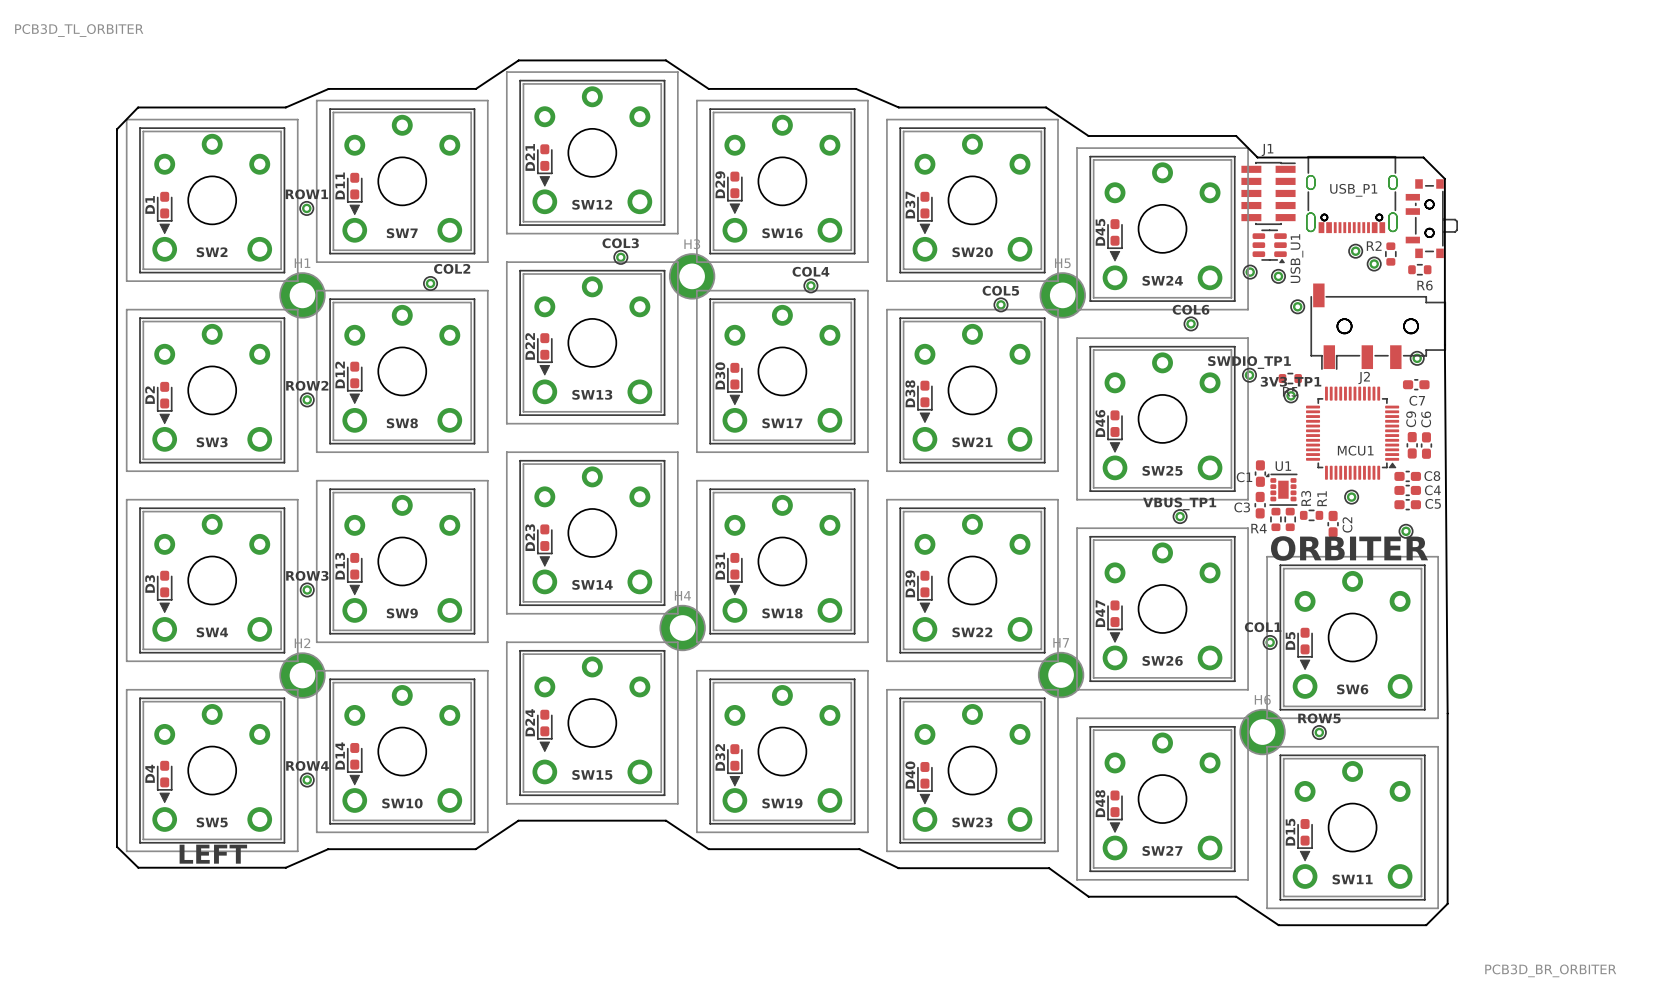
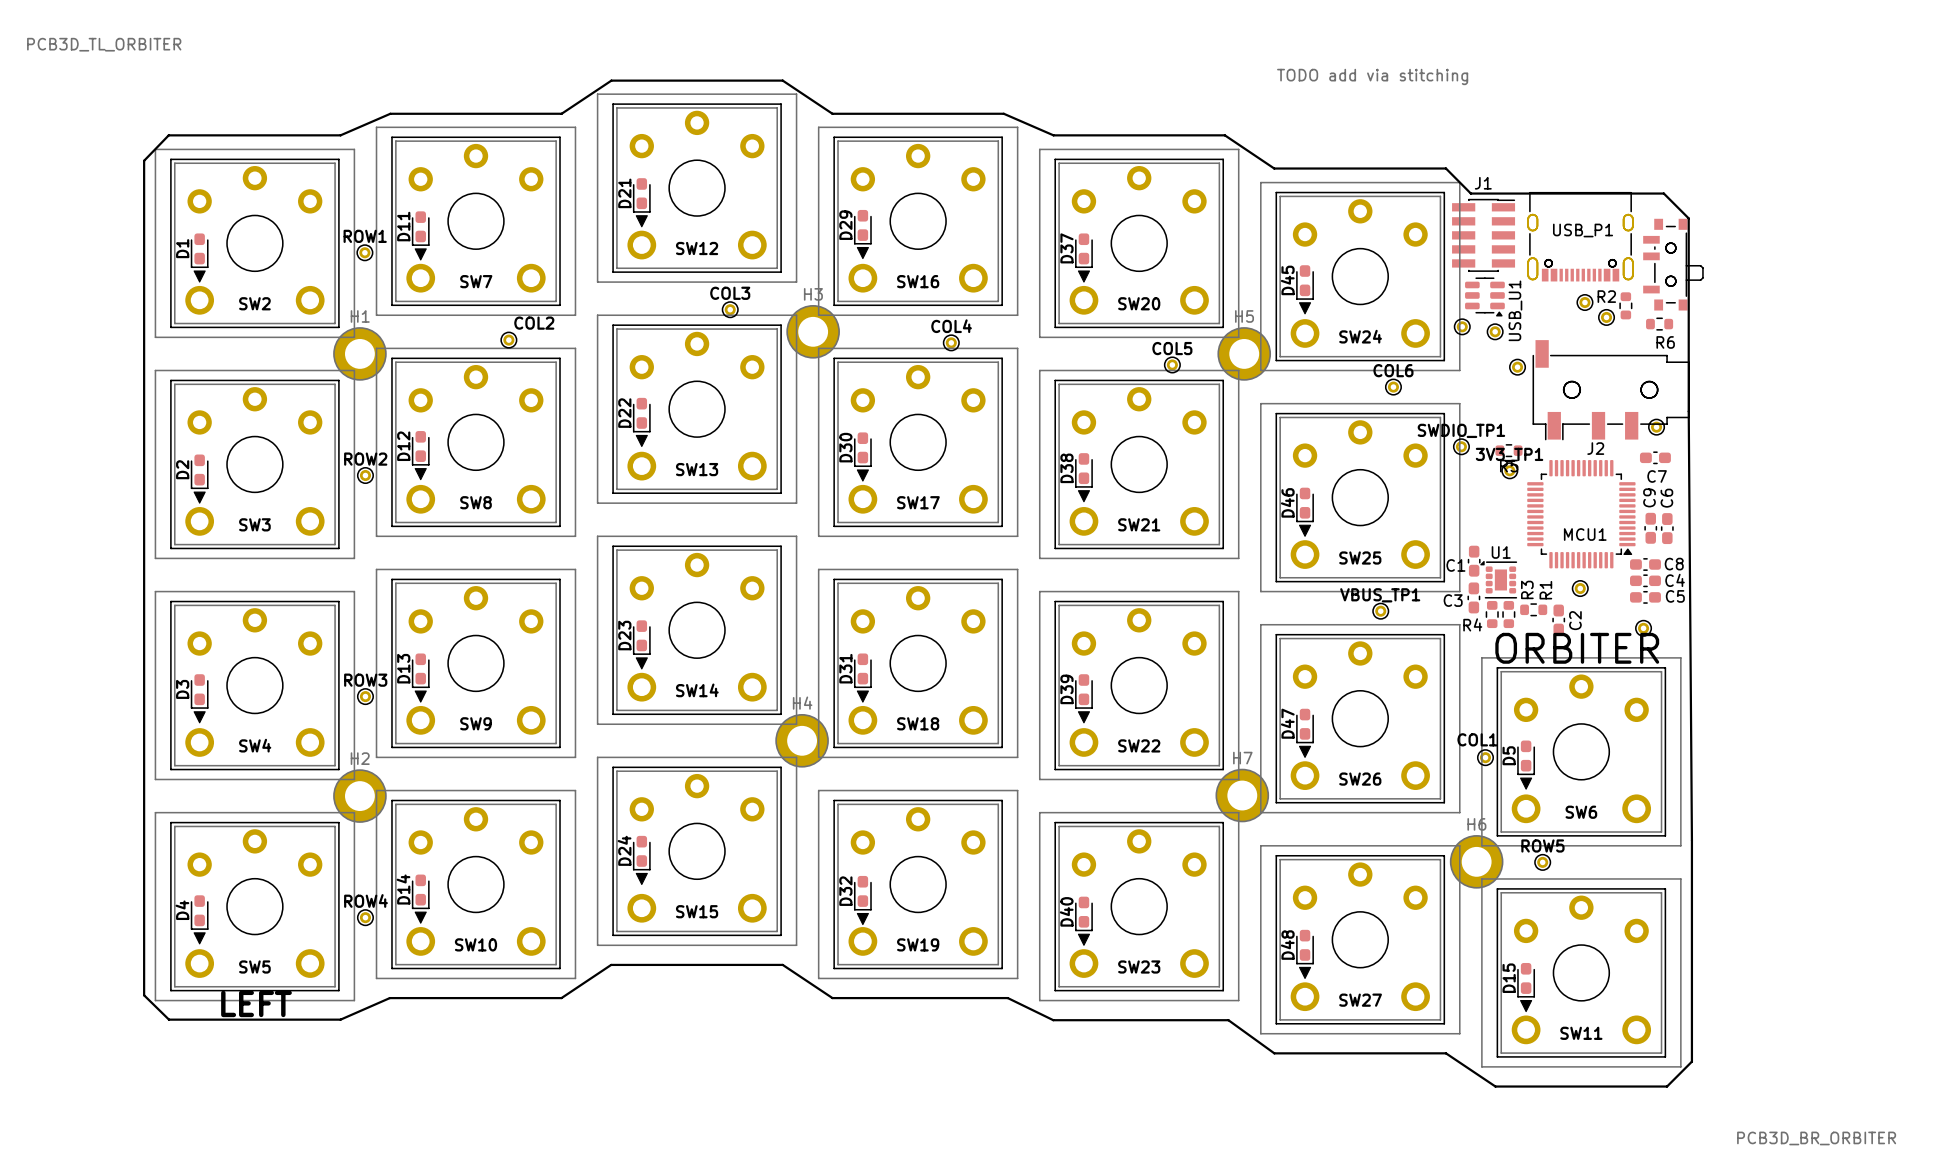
text: none -> TODO add via stitching (1372, 76)

